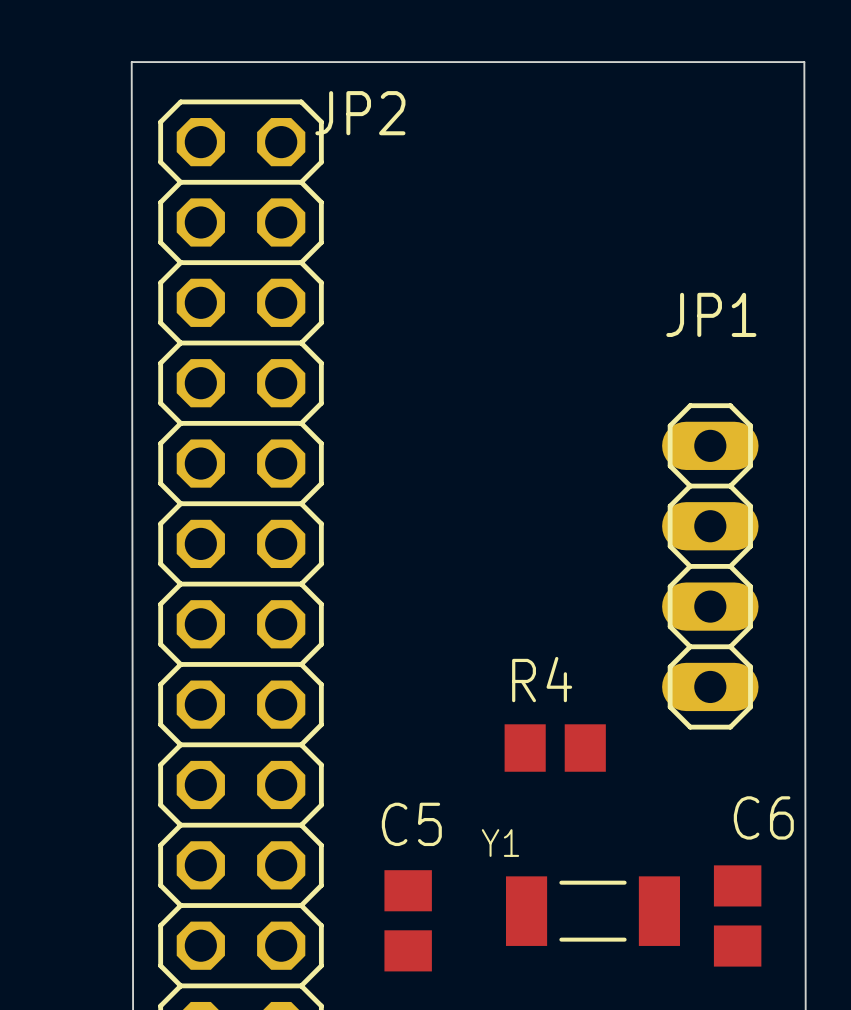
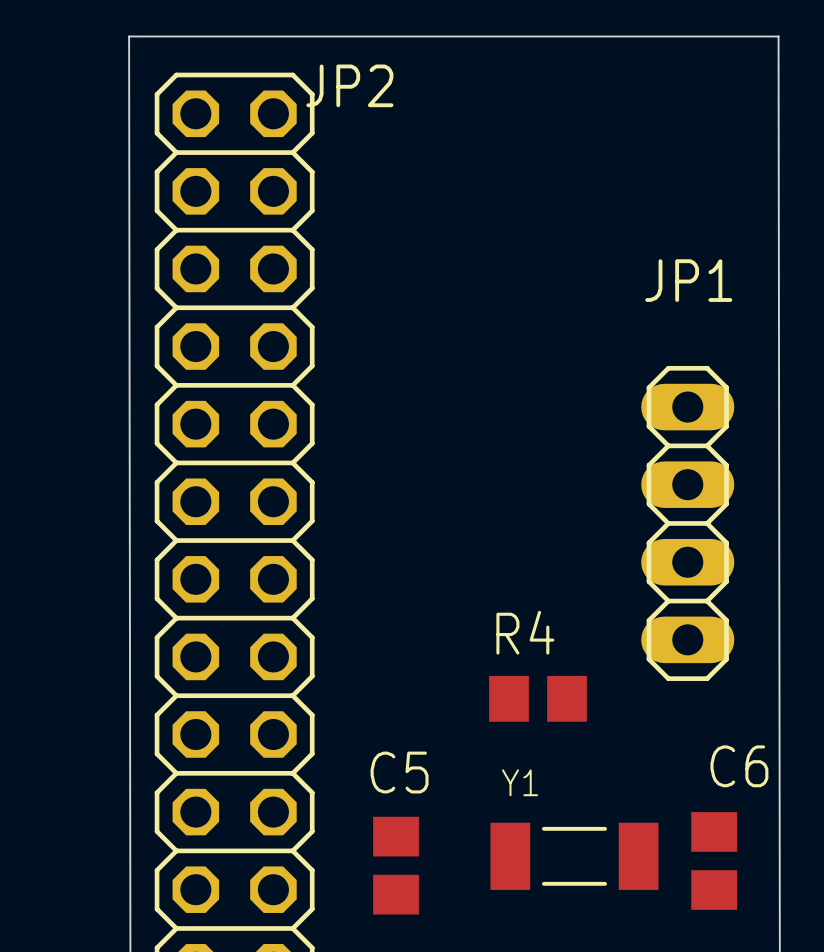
Y1 name position: Y1 (500, 843) -> Y1 (520, 782)

